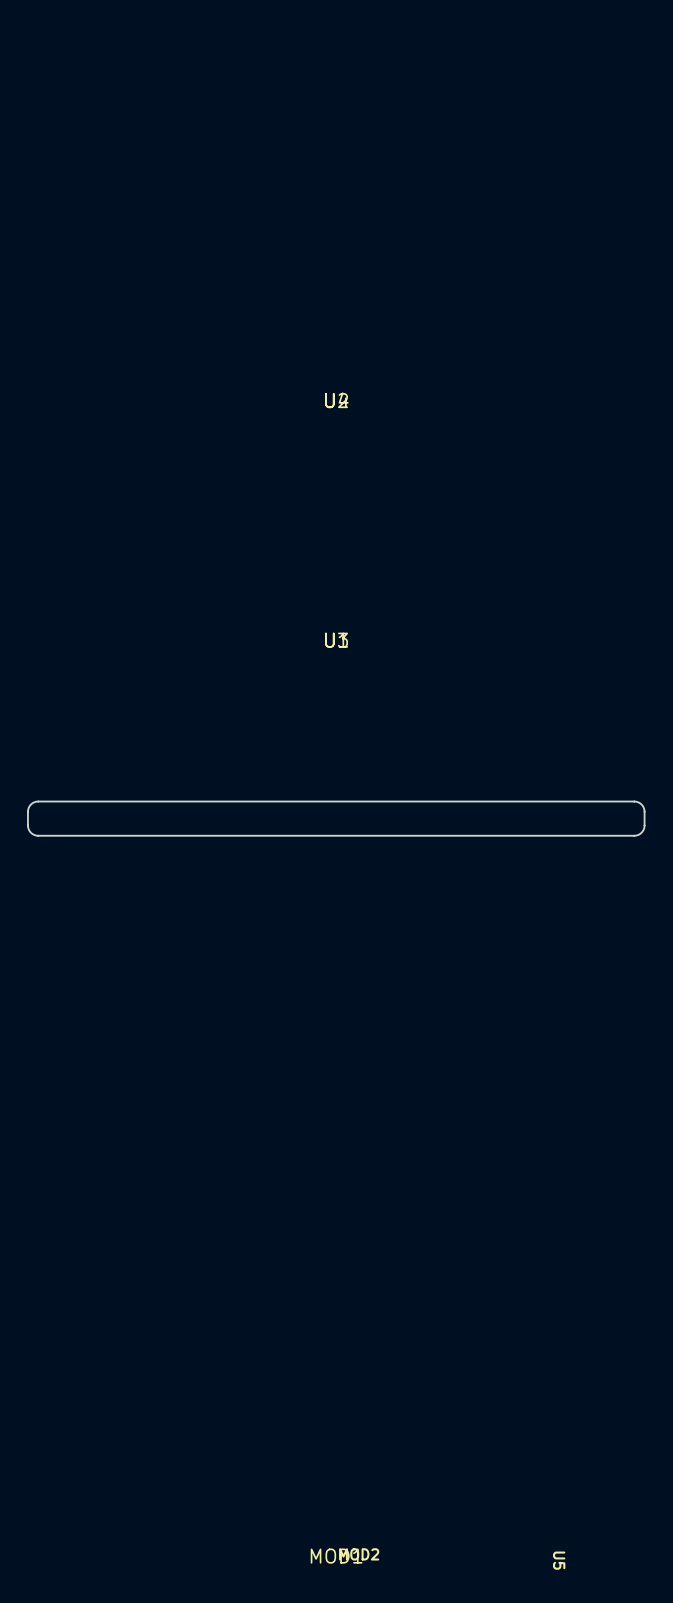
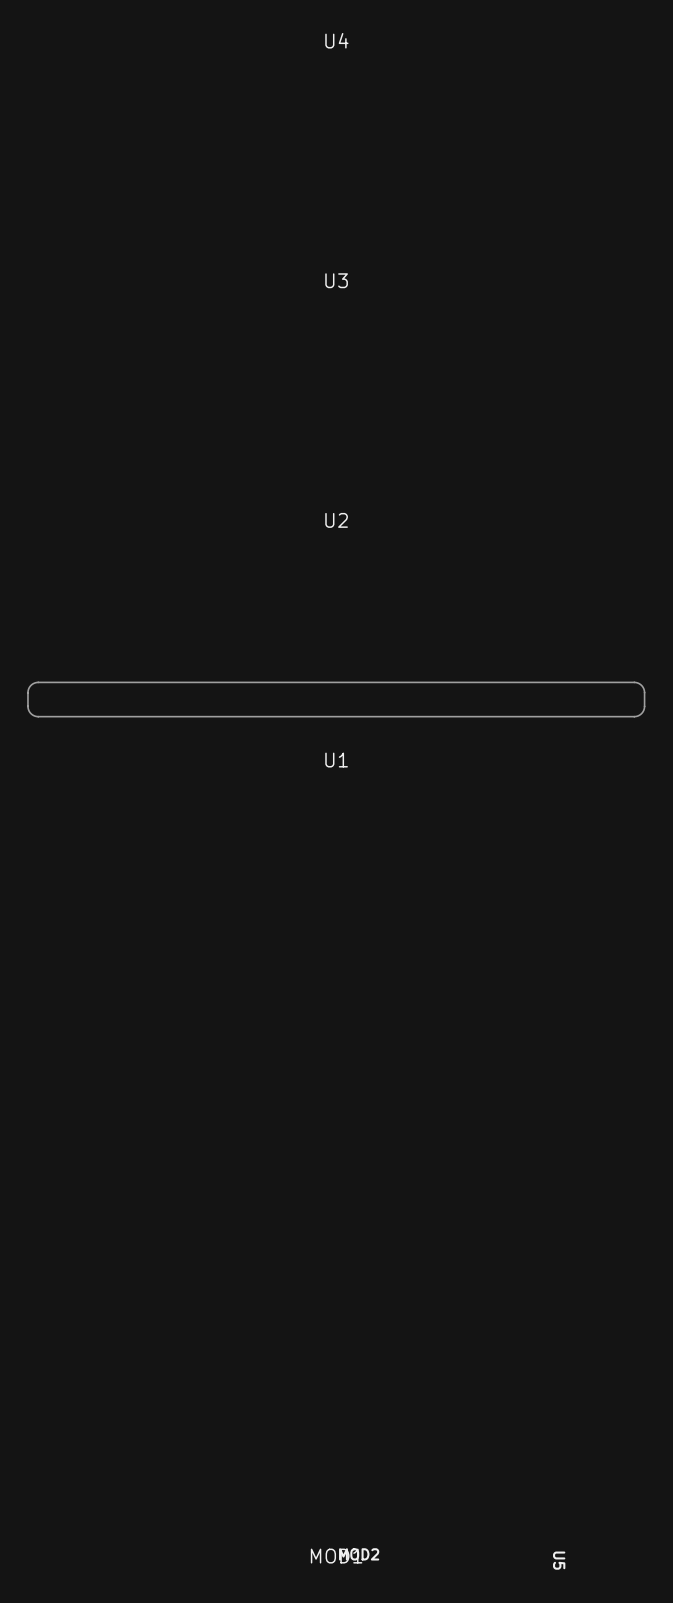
U2 position: (336, 400) -> (336, 520)
U4 position: (336, 400) -> (336, 40)
U1 position: (336, 640) -> (336, 760)
U3 position: (336, 640) -> (336, 280)
board edge: (38, 801) (634, 801) (639, 802) (643, 807) (644, 825) (641, 832) (634, 835) (38, 835) (30, 832) (27, 825) (28, 807) (33, 802) (38, 801) -> (38, 682) (634, 682) (640, 684) (643, 688) (644, 706) (641, 713) (634, 716) (38, 716) (30, 713) (27, 706) (28, 688) (33, 683) (38, 682)

